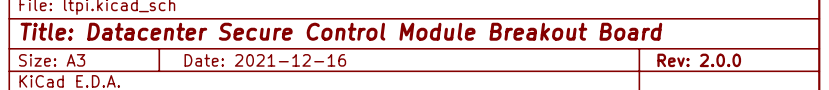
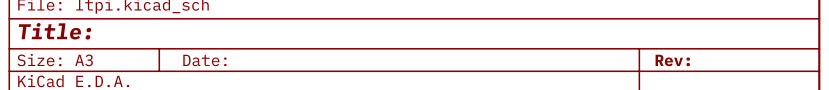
title block: Title: Datacenter Secure Control Module Breakout Board (341, 31) -> Title: (55, 31)
title block: Date: 2021-12-16 (265, 60) -> Date: (204, 60)
title block: Rev: 2.0.0 (699, 60) -> Rev: (672, 60)

